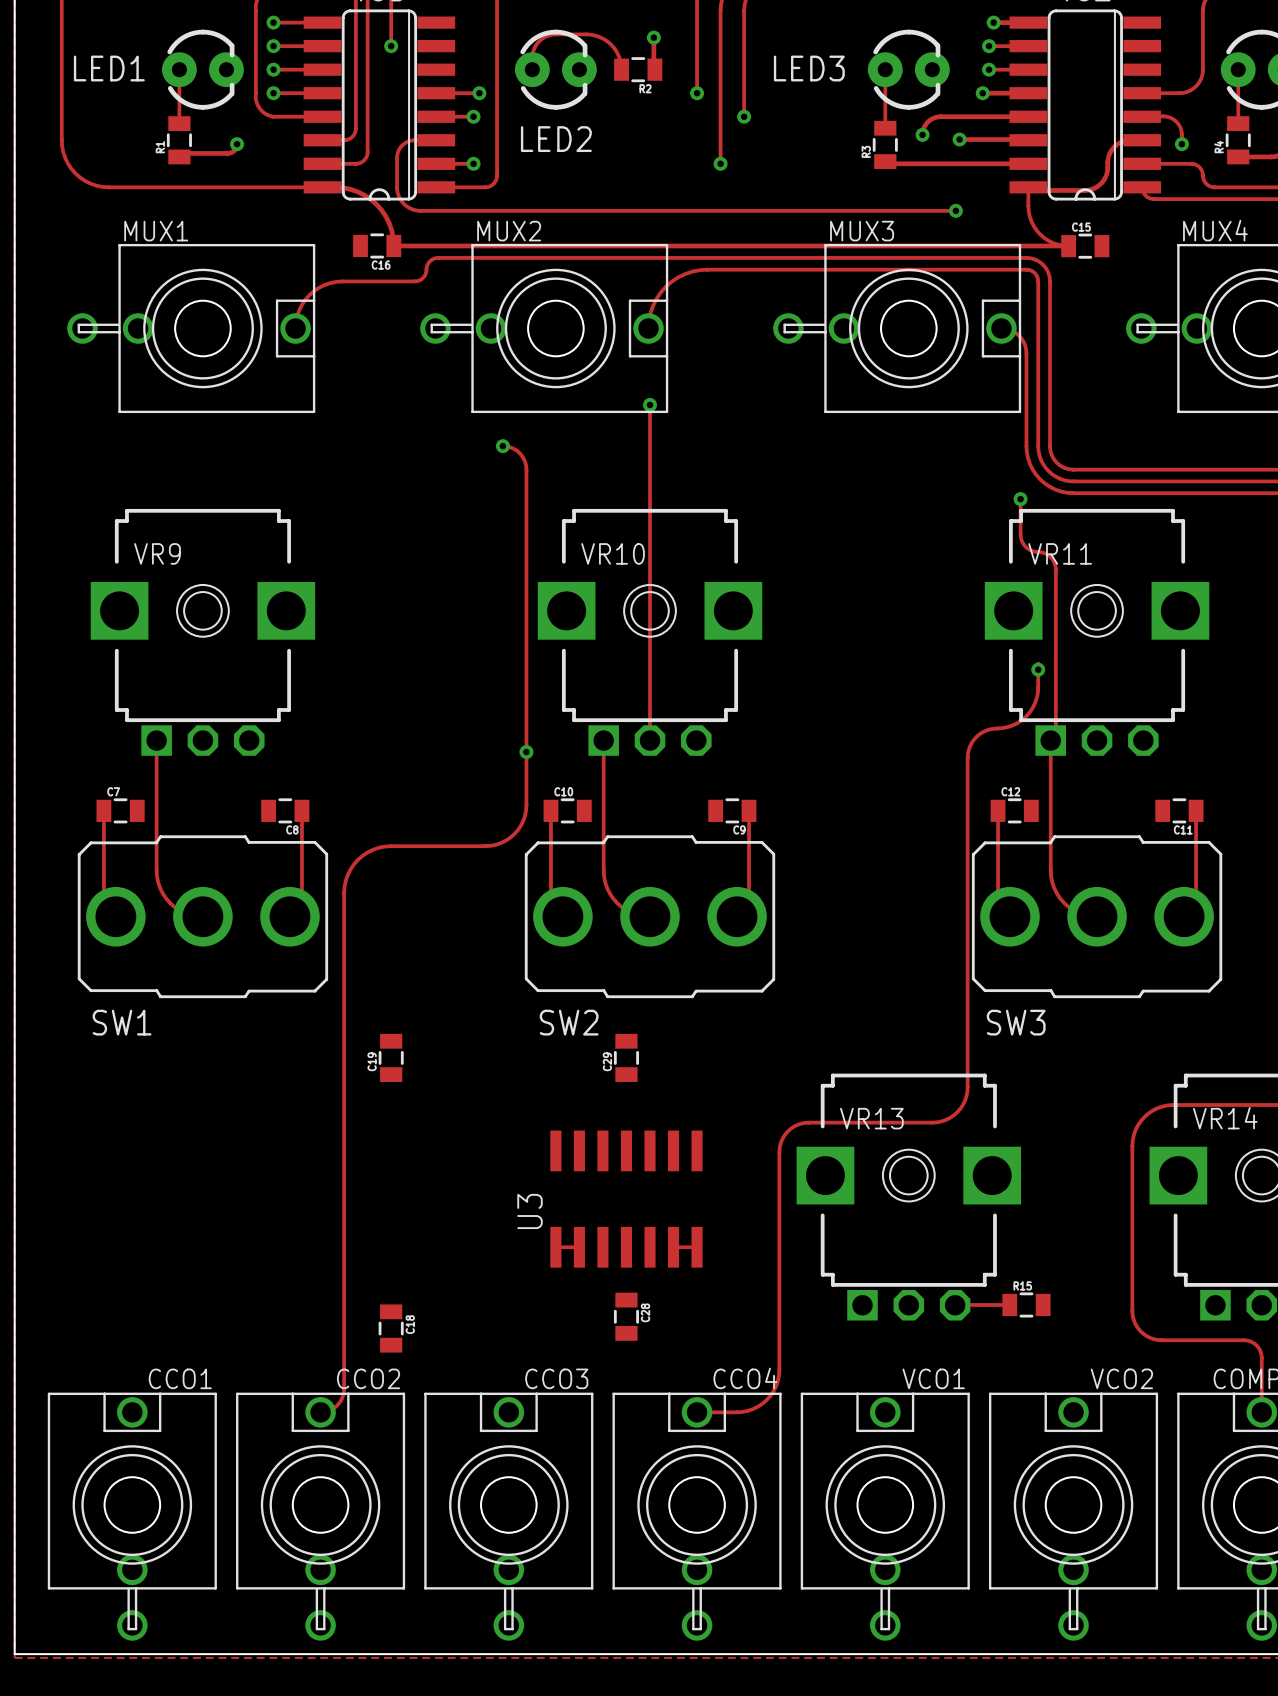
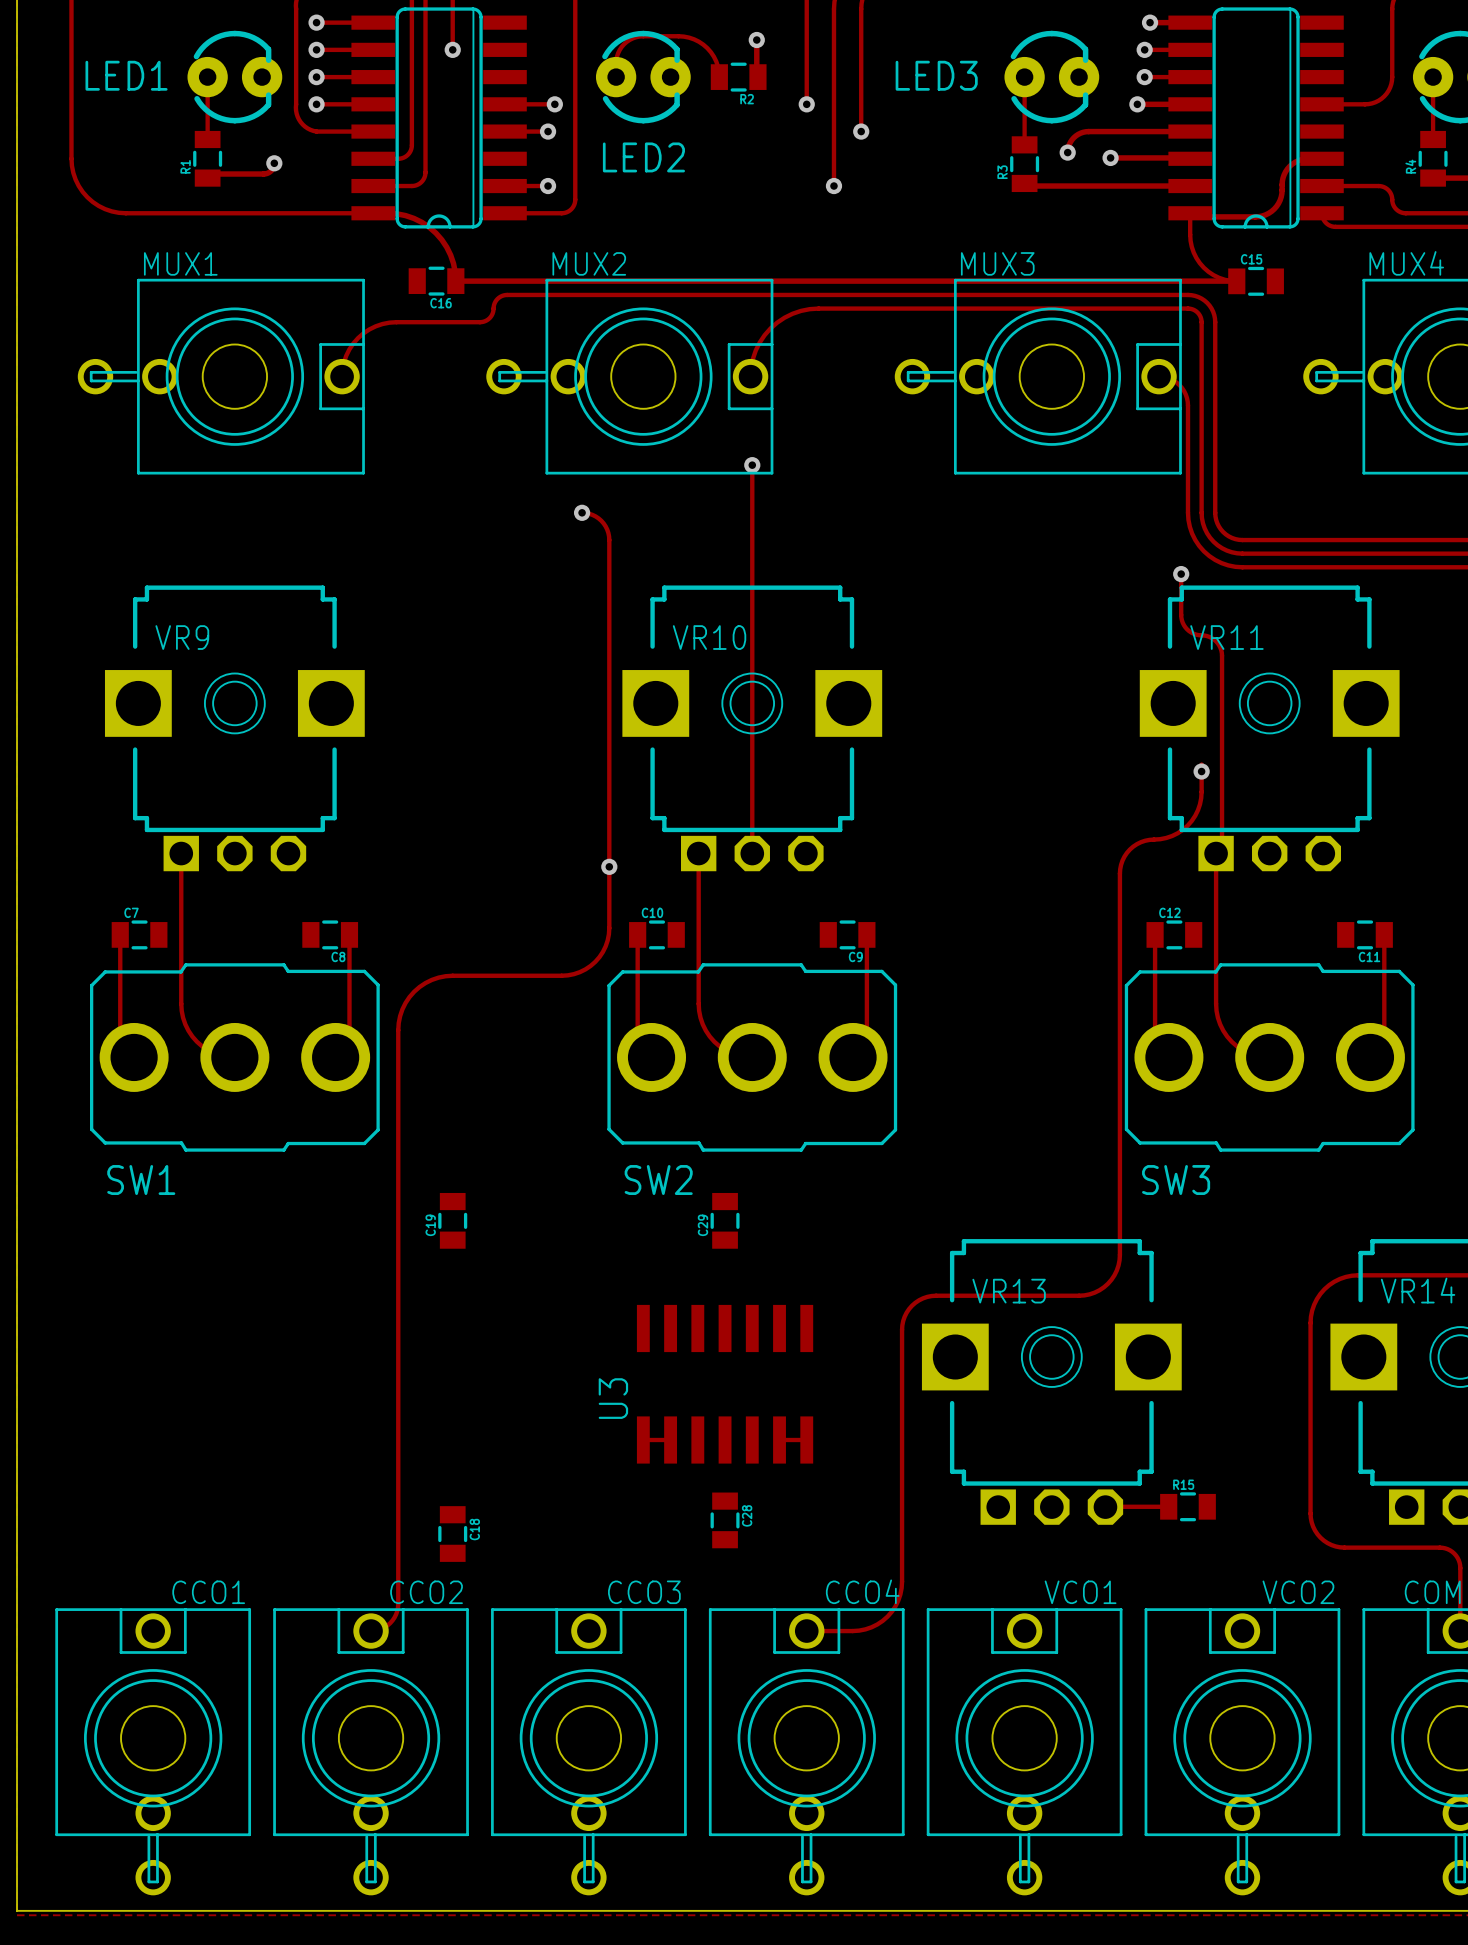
track: (1142, 116) (1165, 116) (1174, 120) (1181, 130) (1181, 144) -> none
track: (436, 140) (410, 140) (402, 145) (397, 153) (397, 193) (403, 203) (414, 210) (955, 210) -> none
via: (1181, 144) -> none
via: (955, 210) -> none

